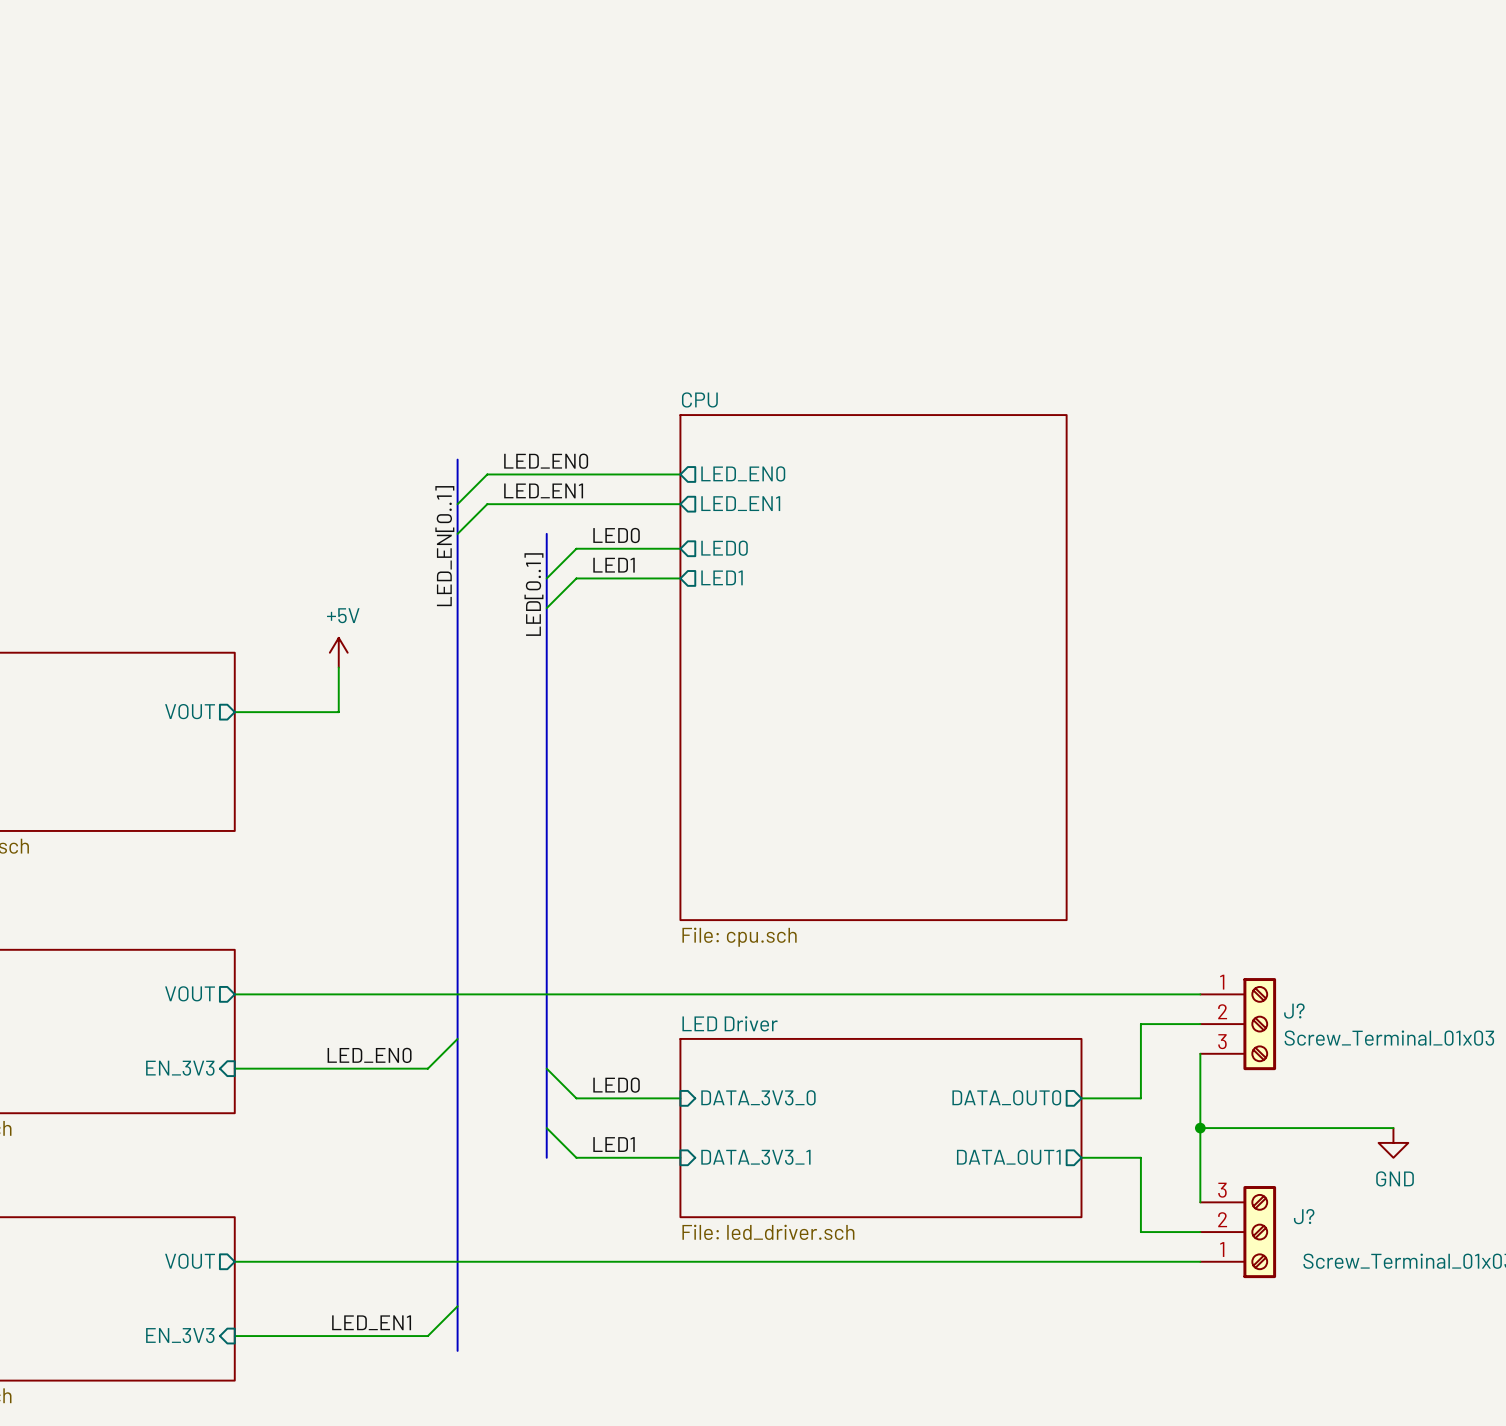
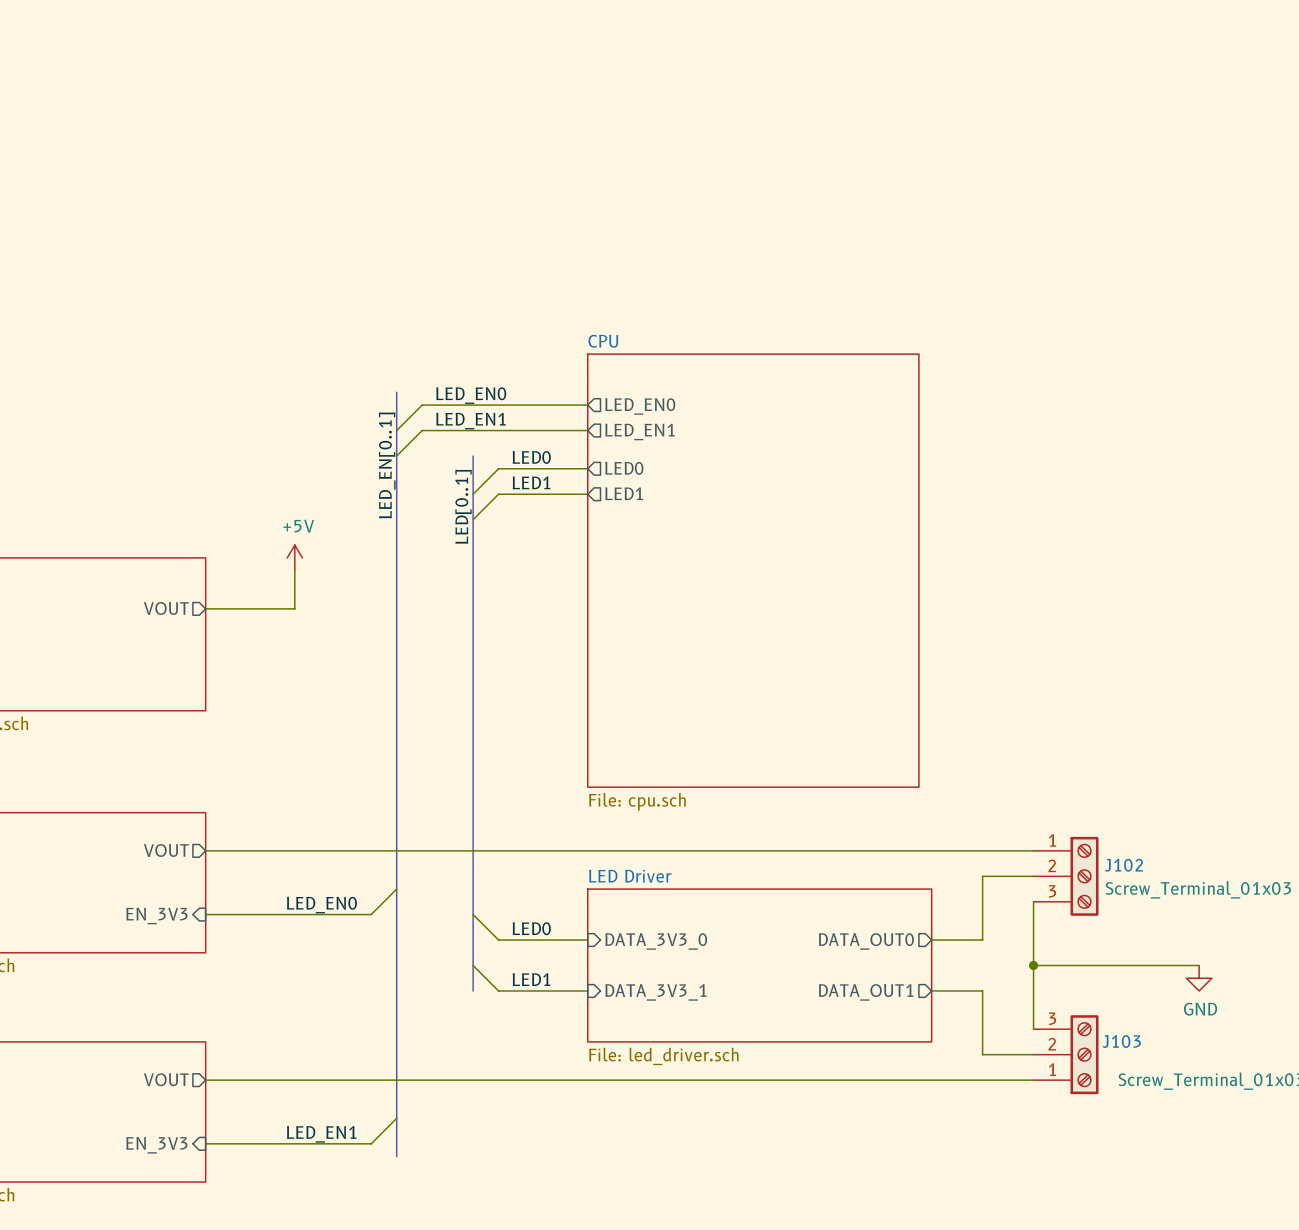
J? name: J? (1294, 1011) -> J102 (1123, 865)
J? name: J? (1304, 1216) -> J103 (1121, 1041)

